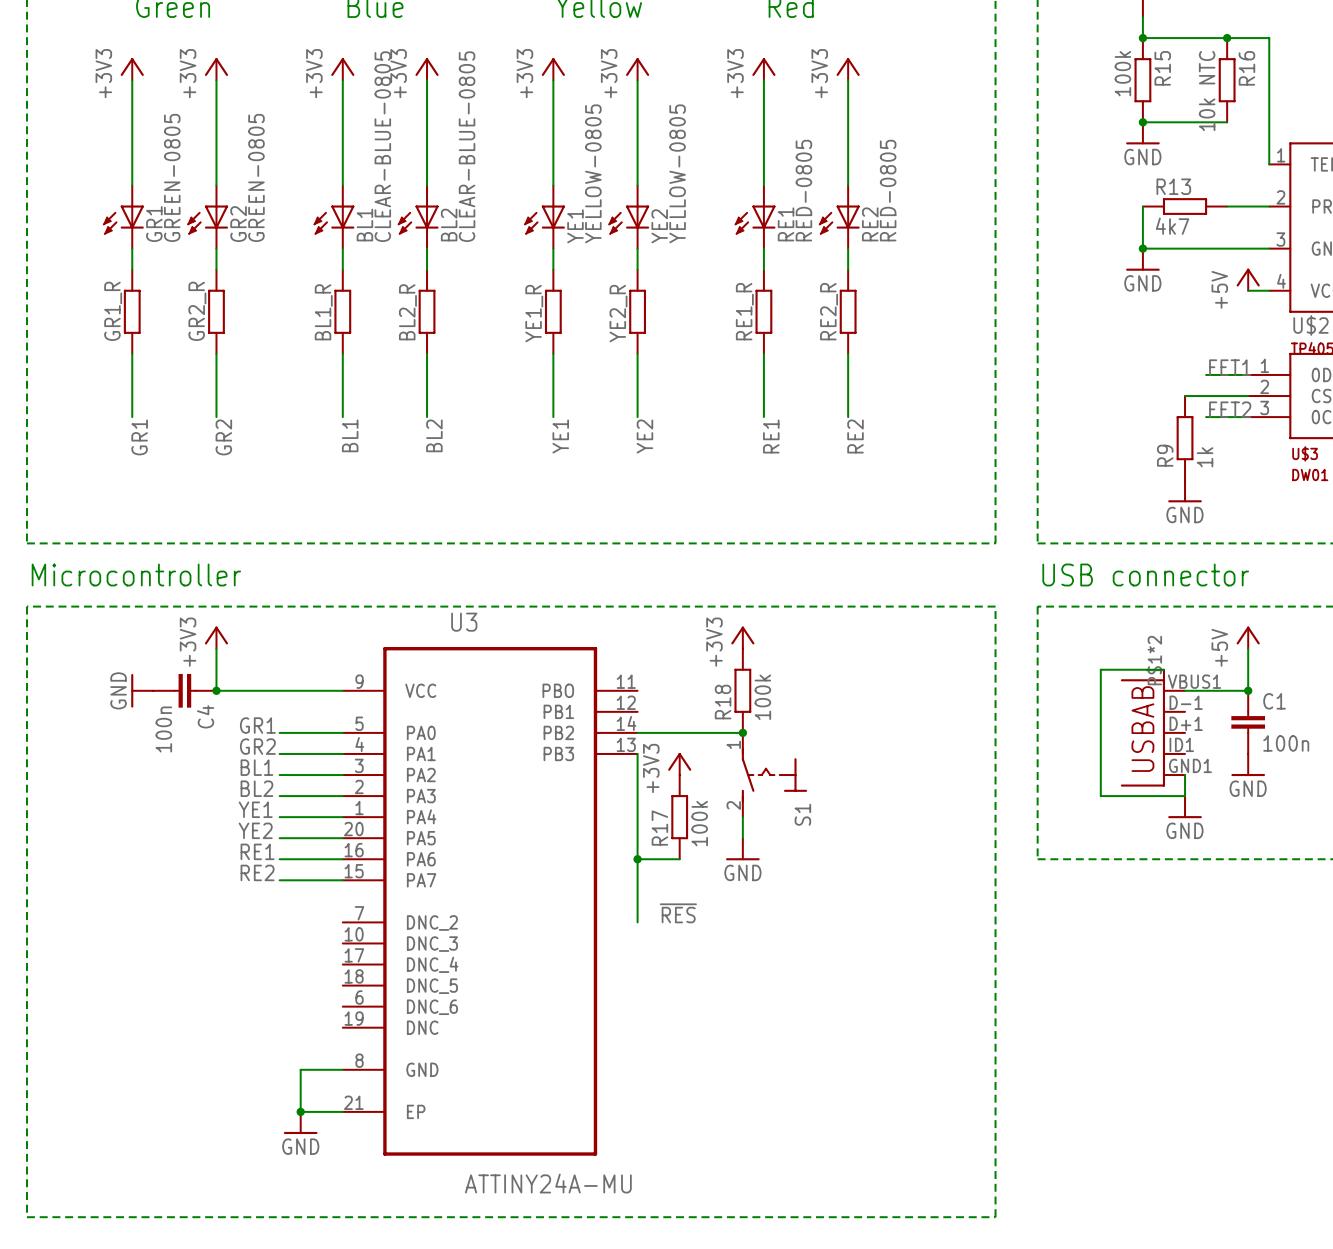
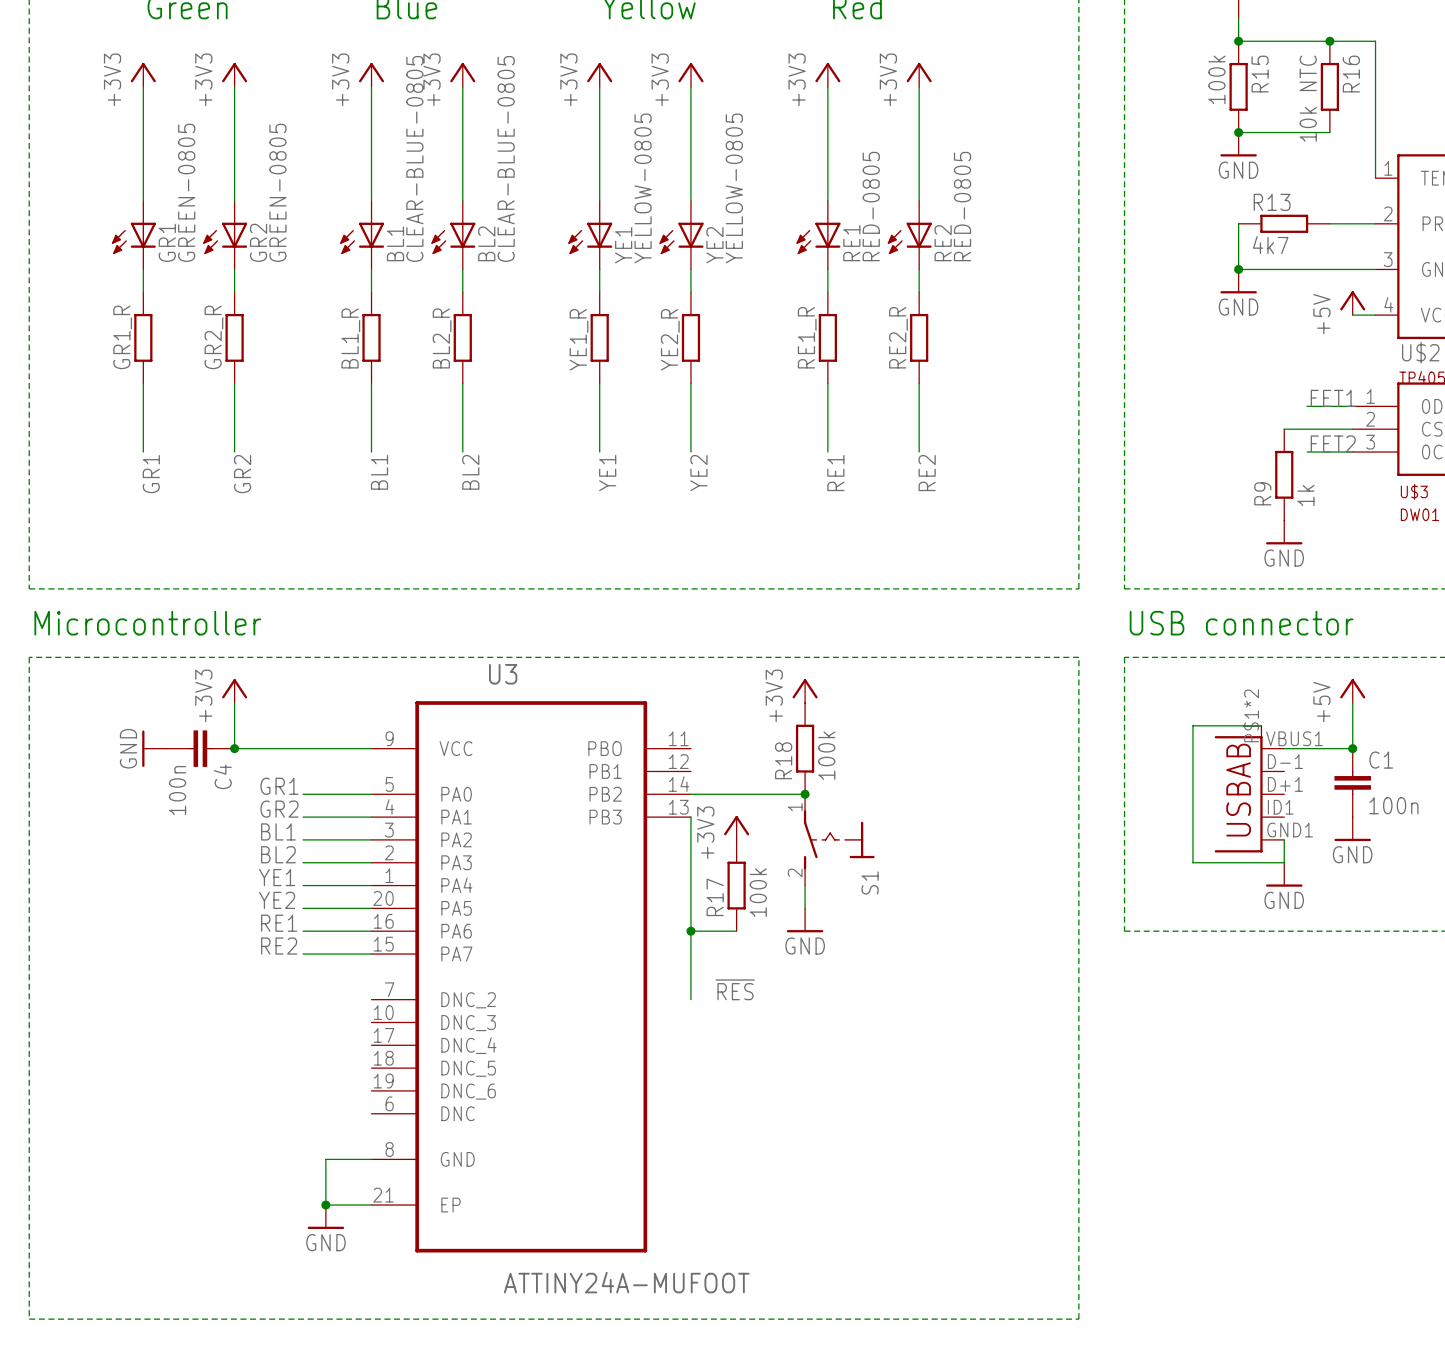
U3 pin number: 6 (359, 997) -> 19 (383, 1081)
U3 pin number: 19 (354, 1018) -> 6 (389, 1103)
U3 value: ATTINY24A-MU (548, 1183) -> ATTINY24A-MUFOOT (626, 1282)

